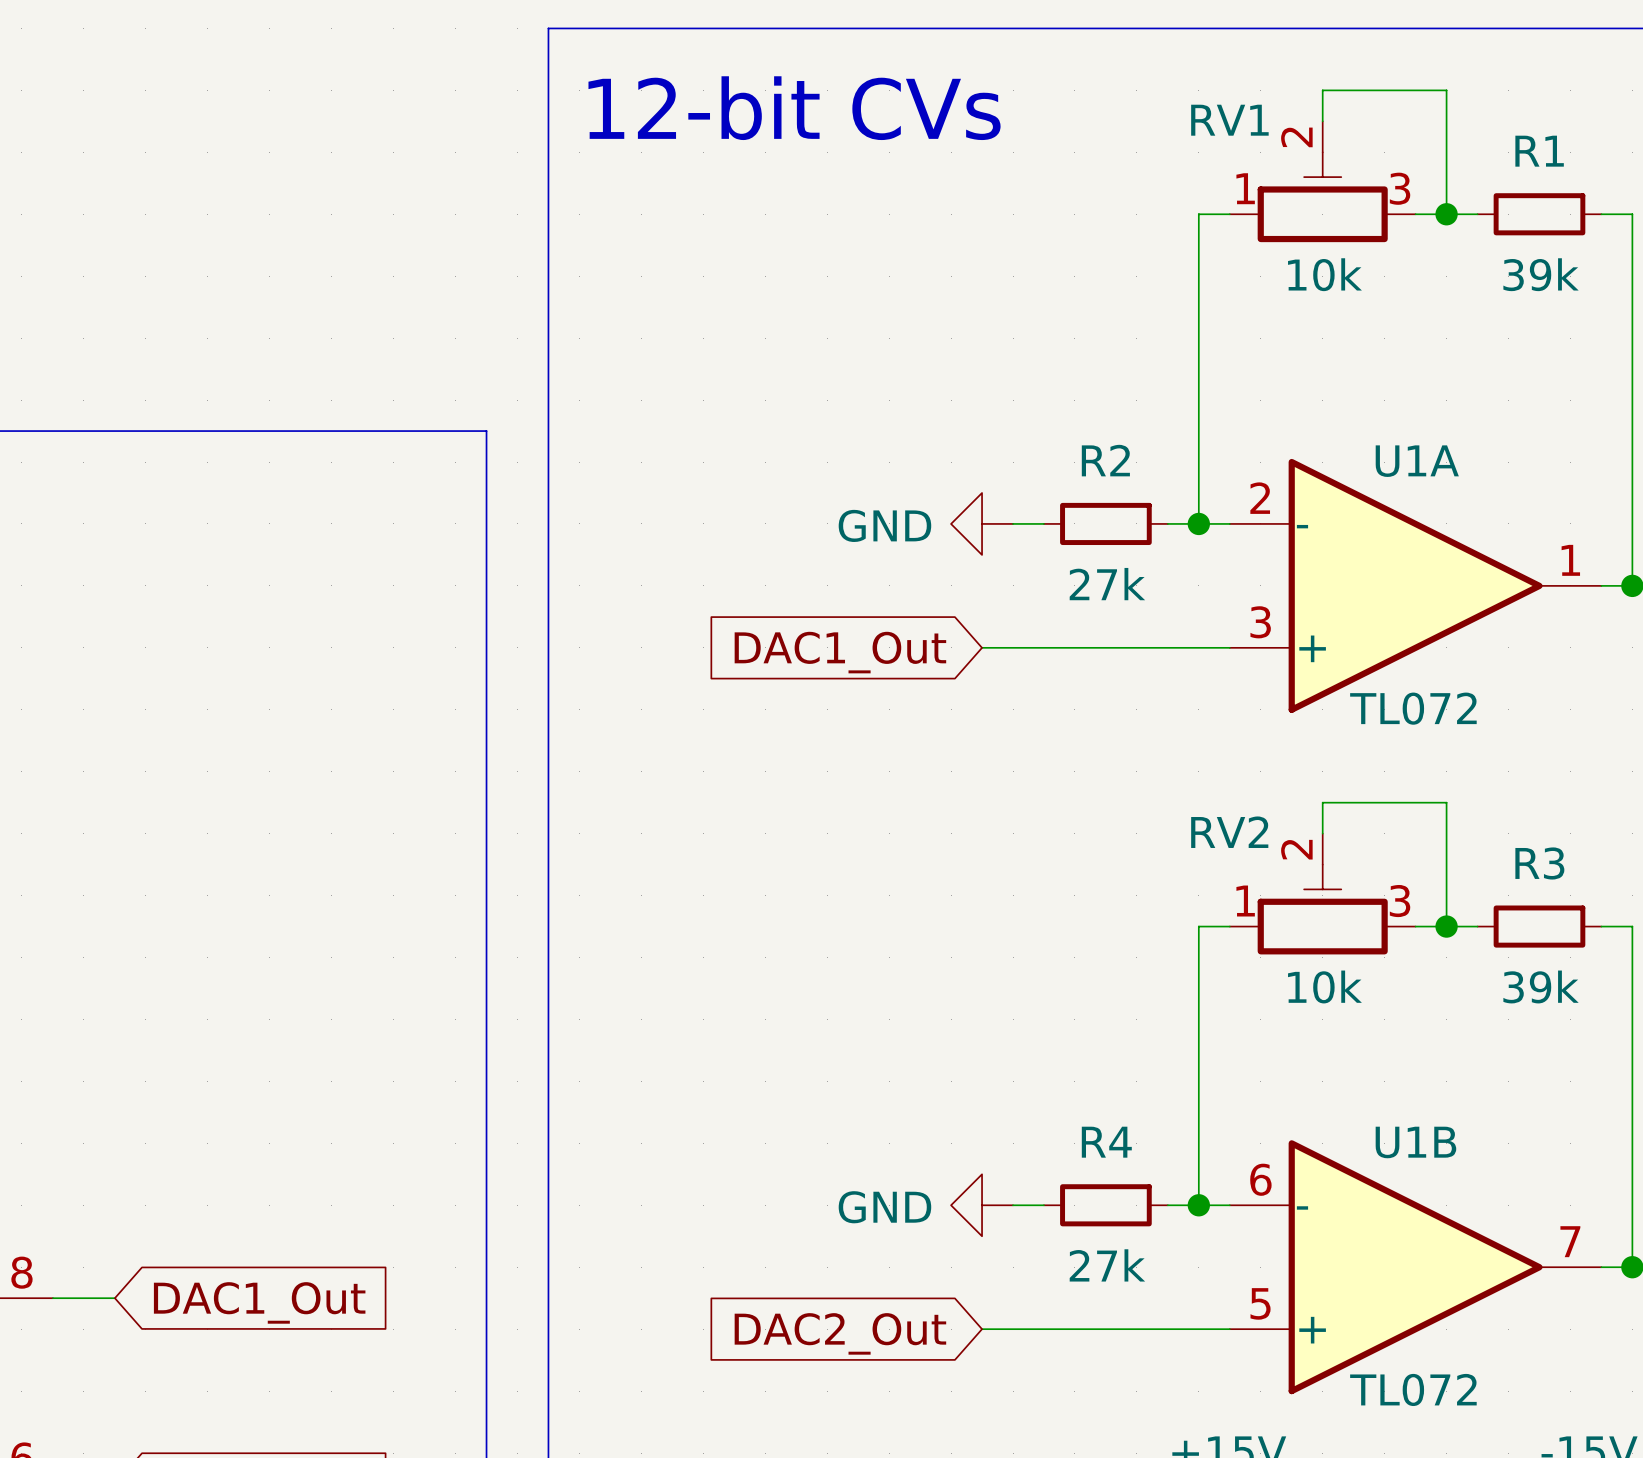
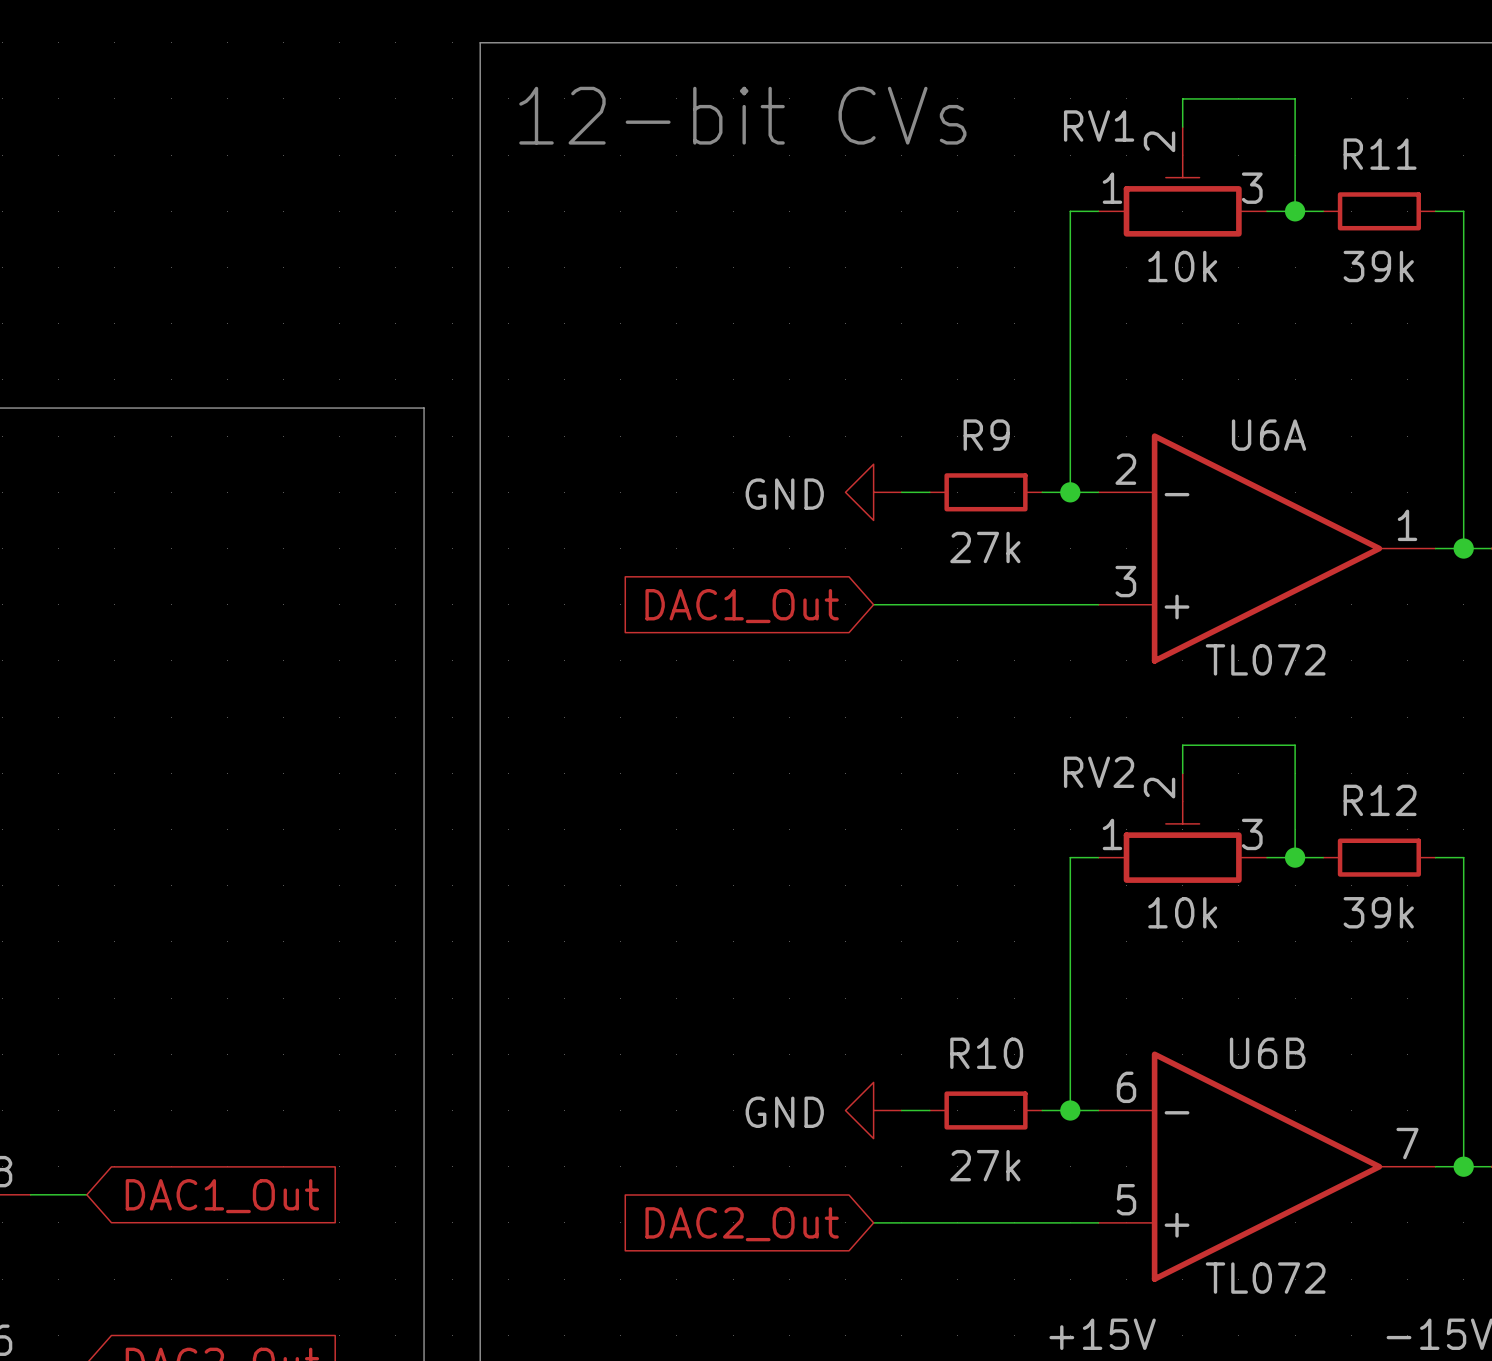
R1 name: R1 (1539, 151) -> R11 (1380, 154)
R2 name: R2 (1105, 460) -> R9 (986, 435)
U1A name: U1A (1417, 461) -> U6A (1269, 435)
R3 name: R3 (1539, 863) -> R12 (1380, 800)
R4 name: R4 (1106, 1142) -> R10 (986, 1053)
U1B name: U1B (1415, 1142) -> U6B (1267, 1053)

